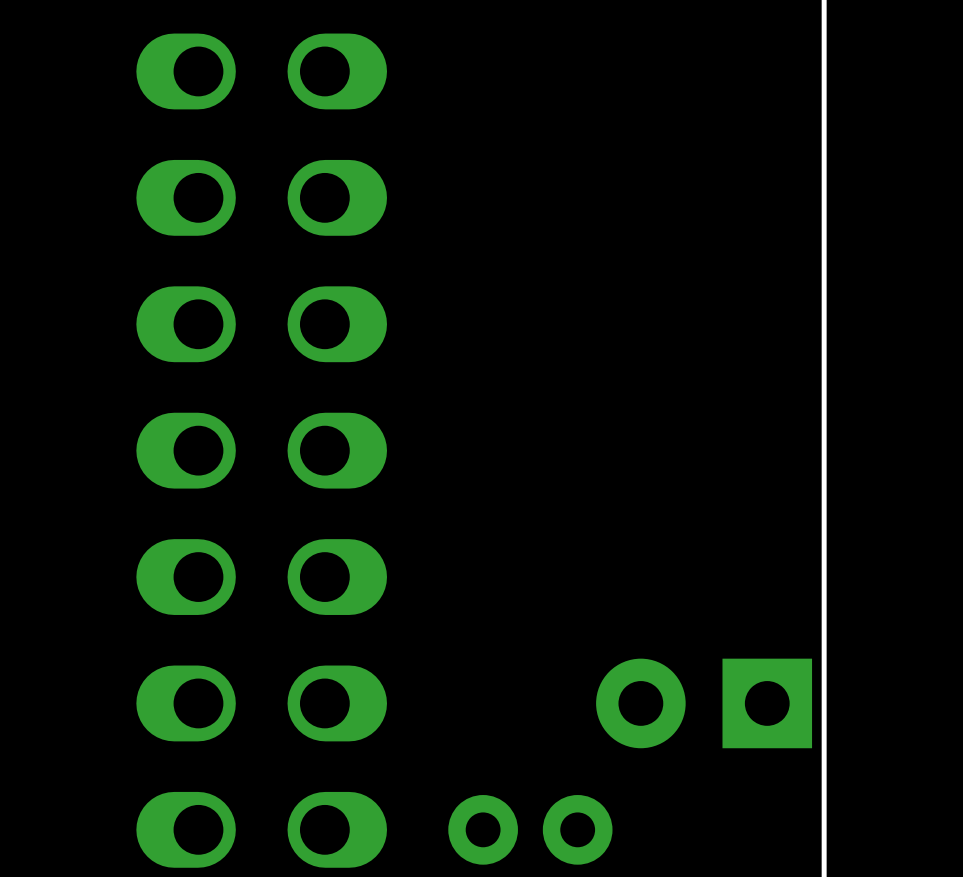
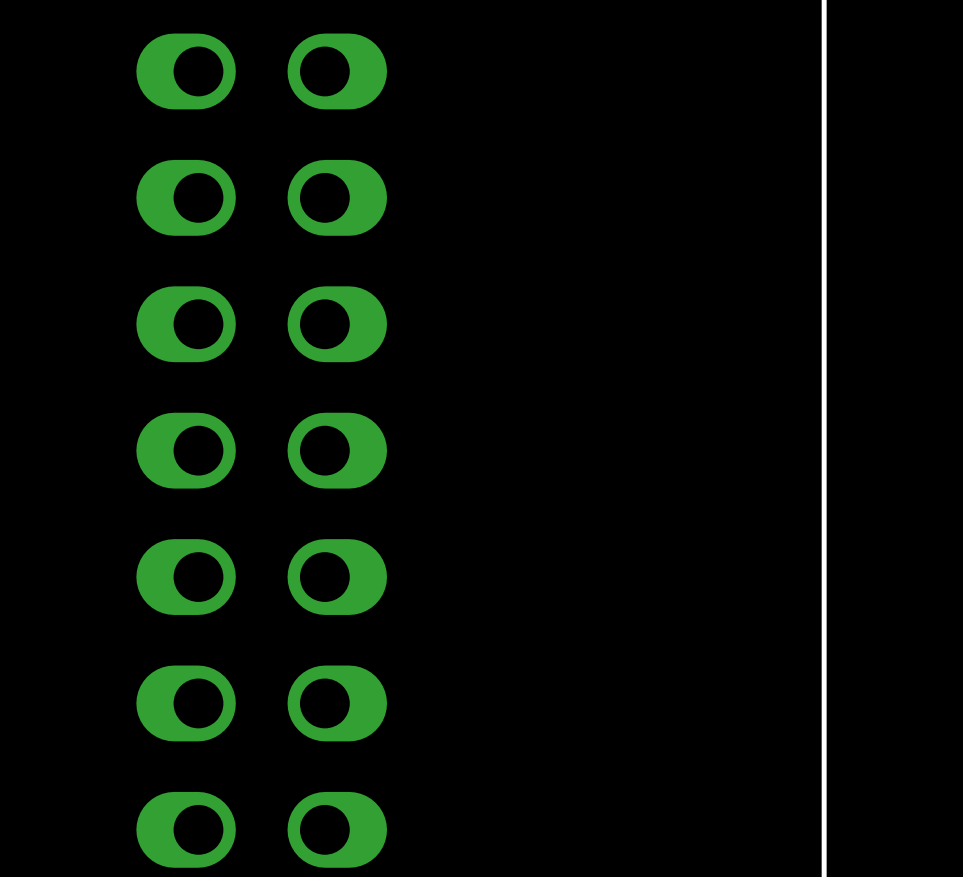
part: (704, 703) -> none
part: (530, 829) -> none

